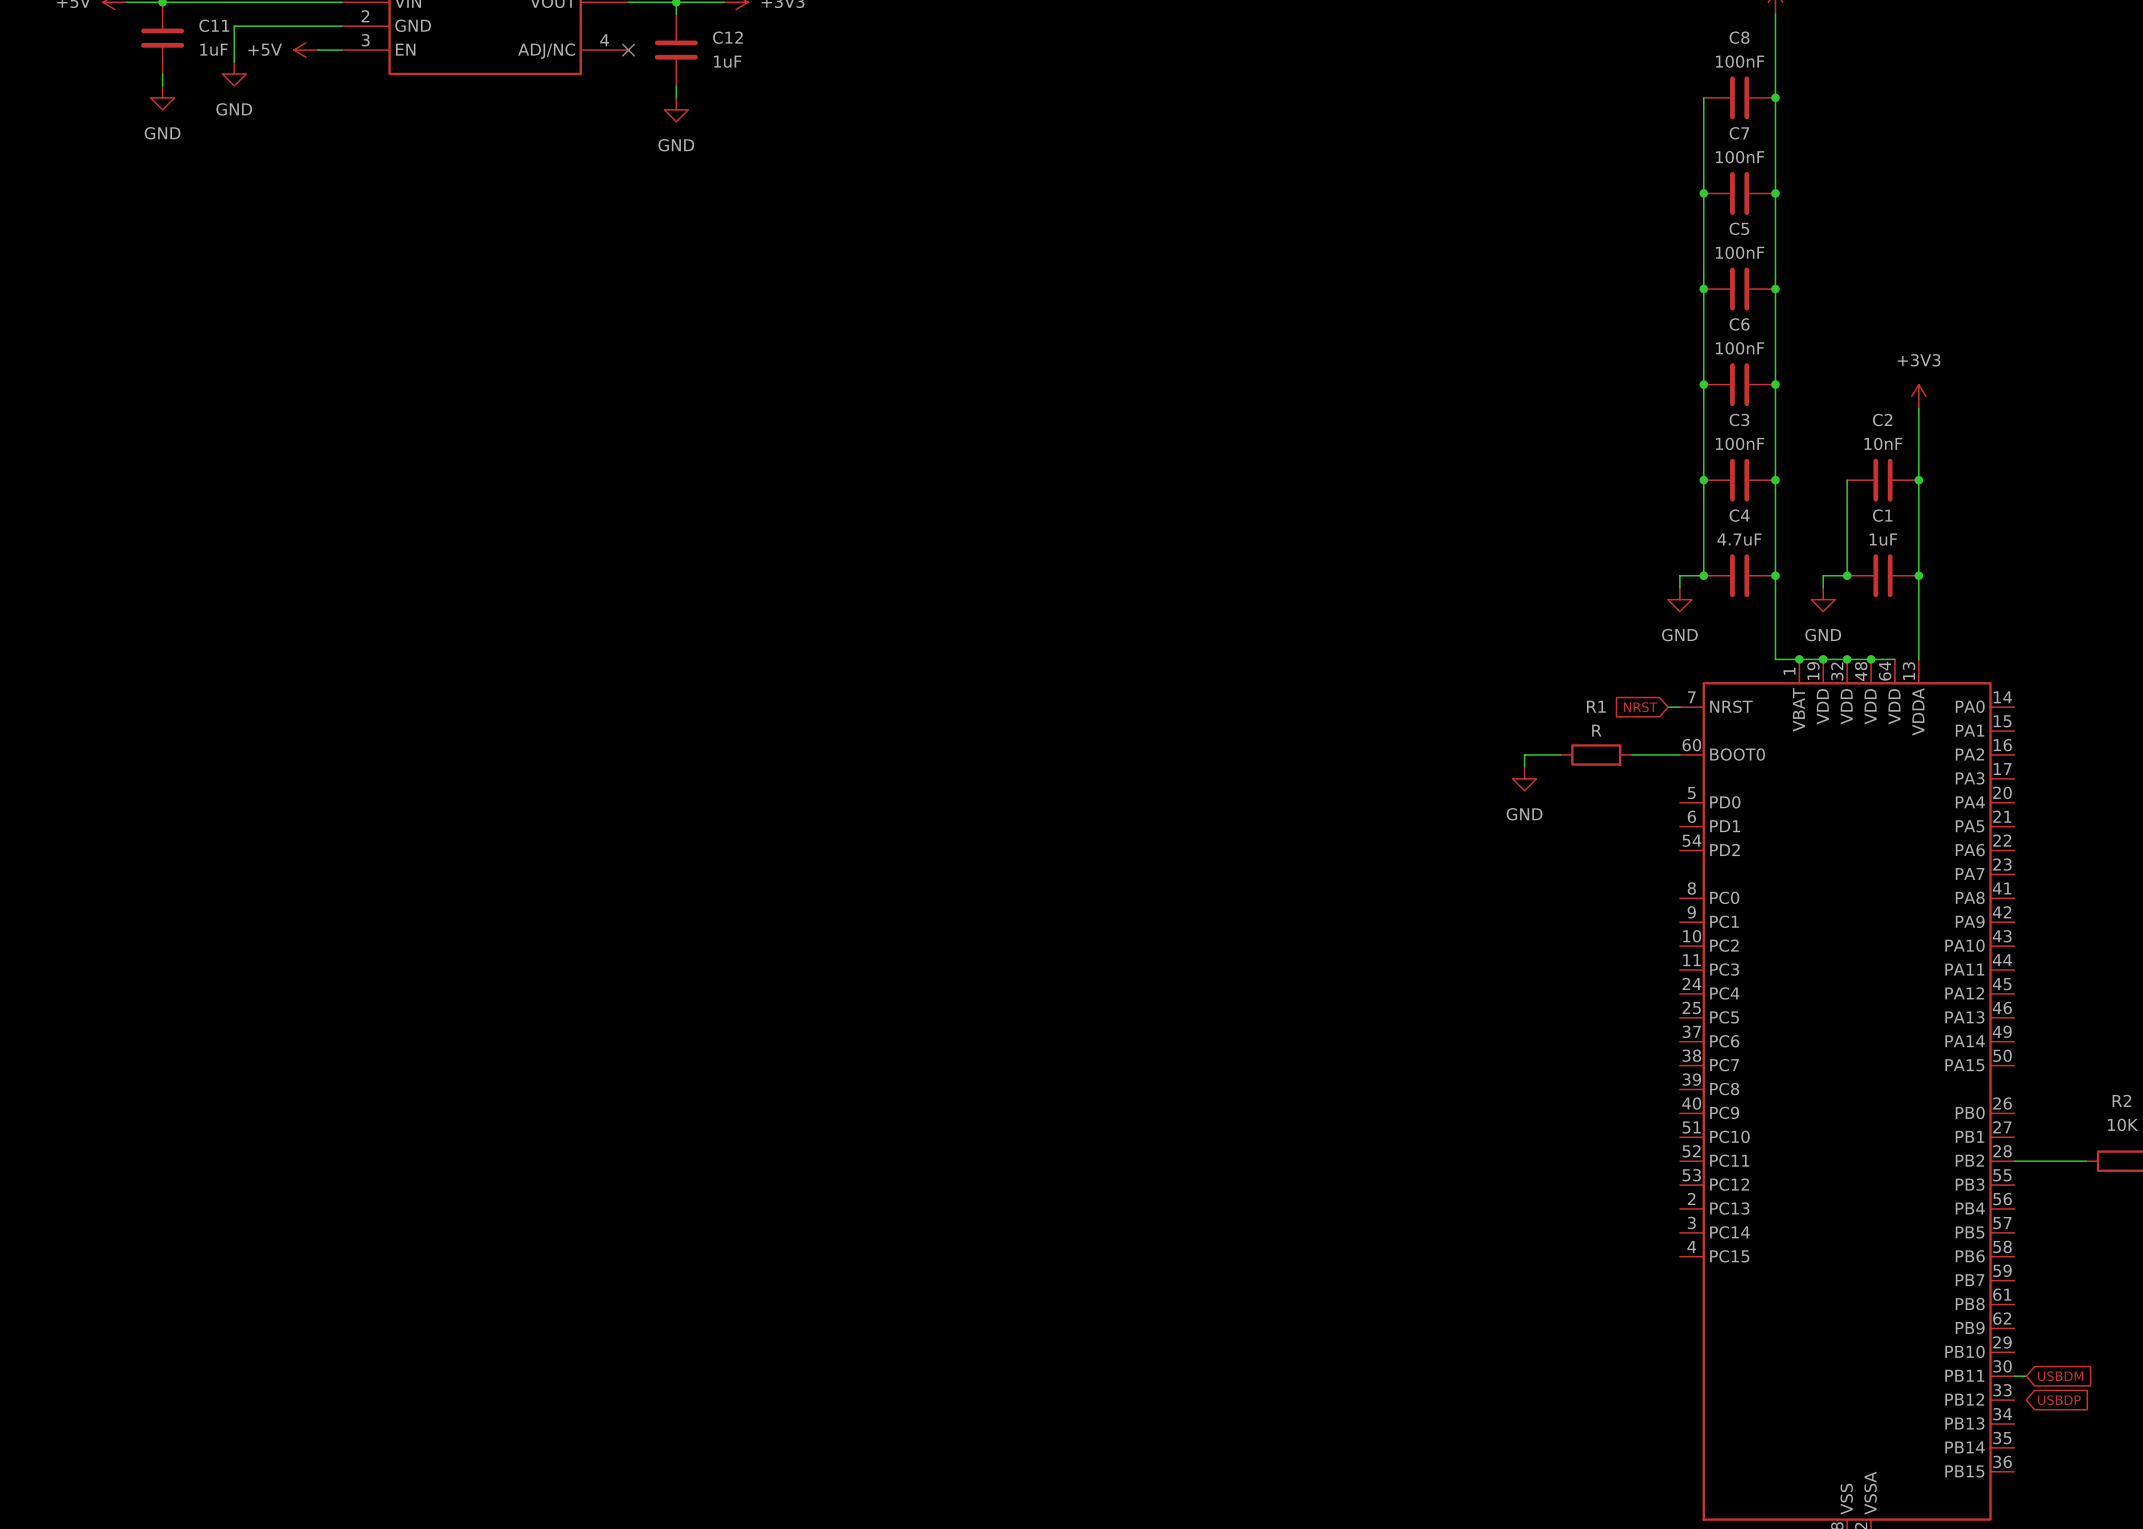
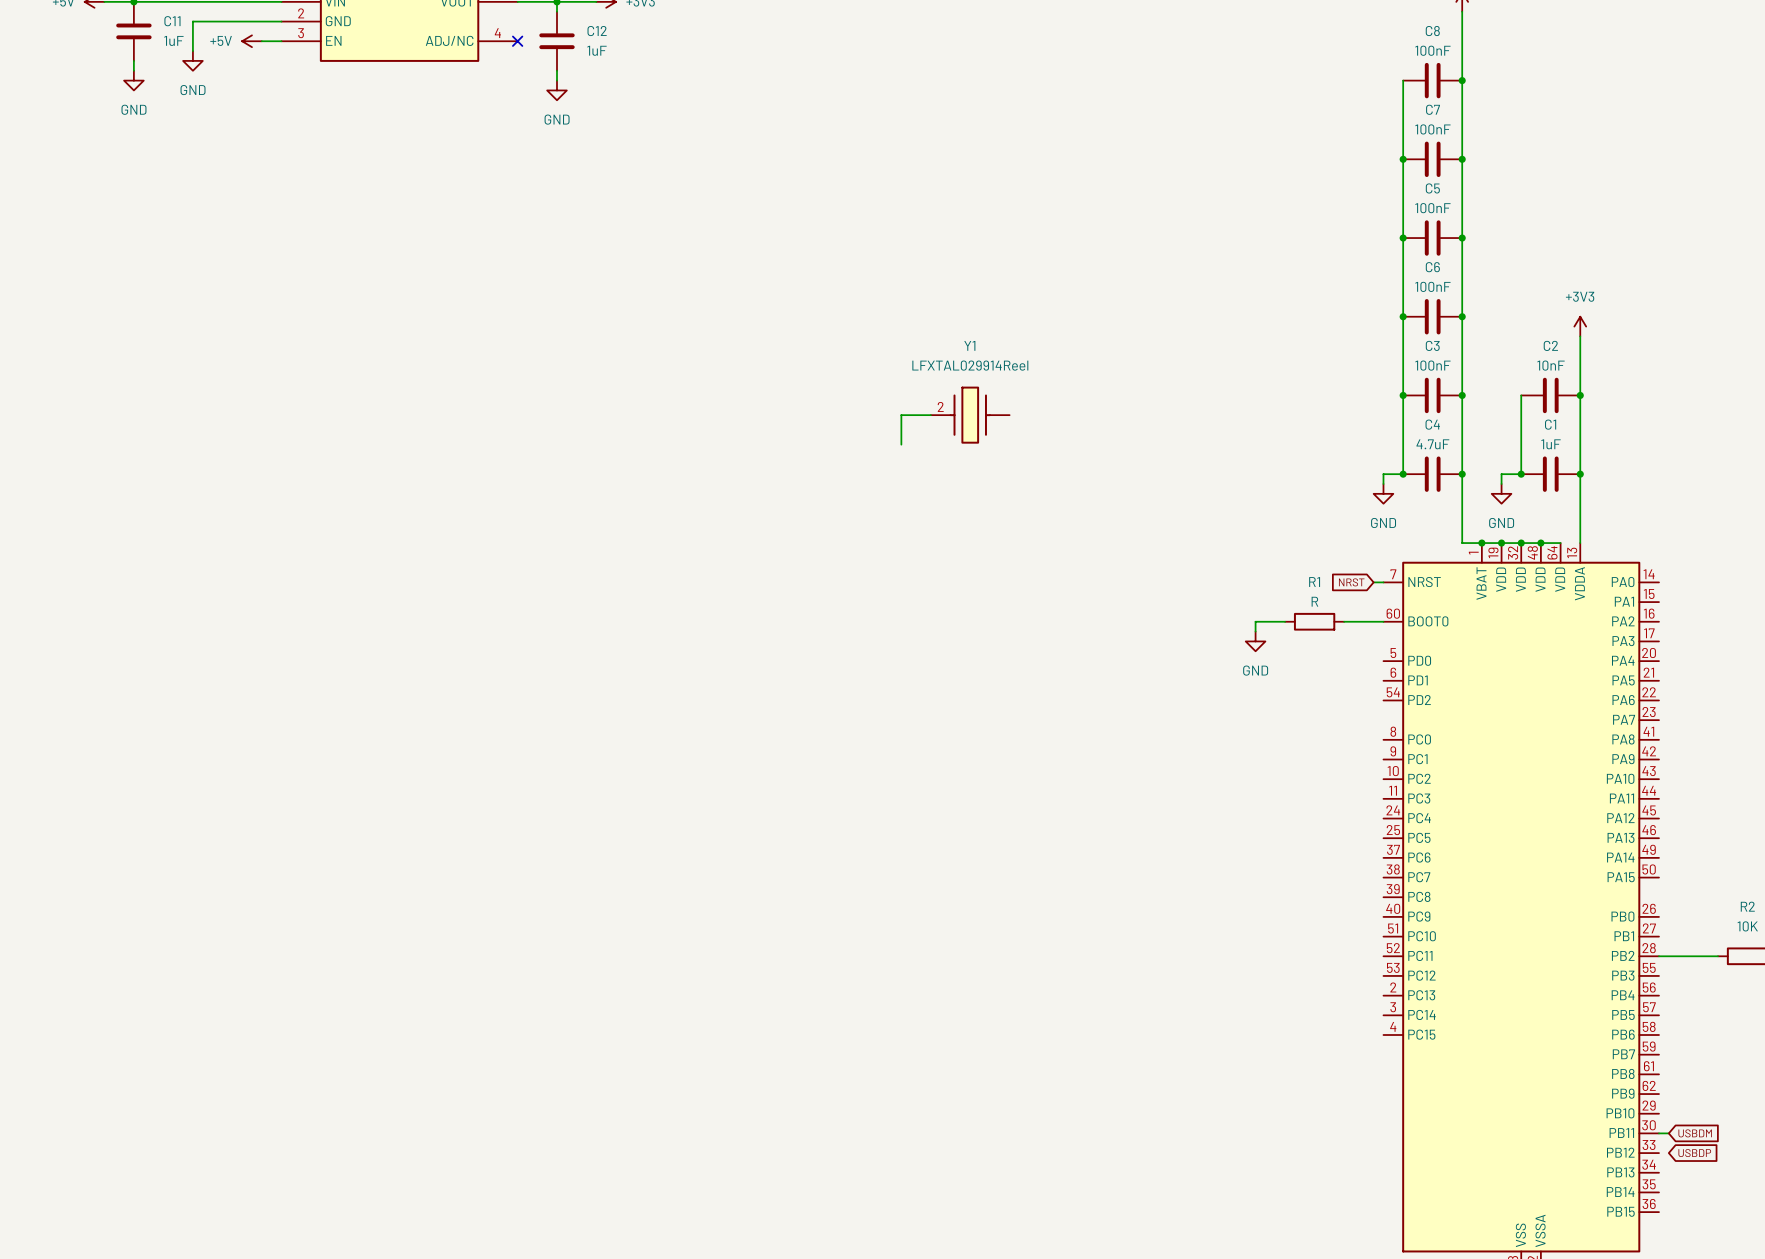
wire: none -> (930, 415) (901, 415) (901, 444)
Y1: none -> LFXTAL029914Reel (970, 415)

